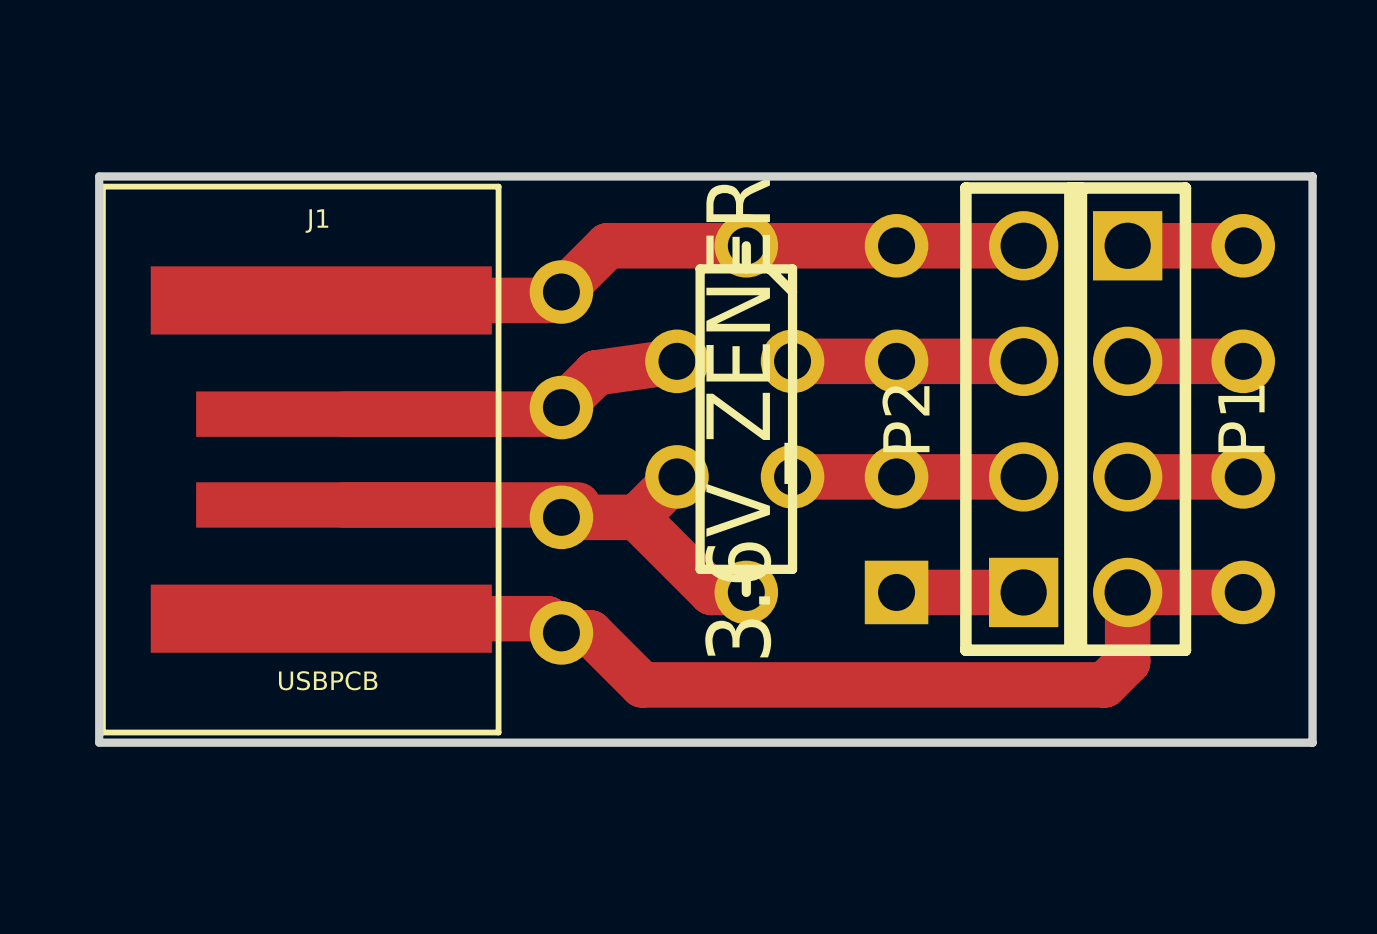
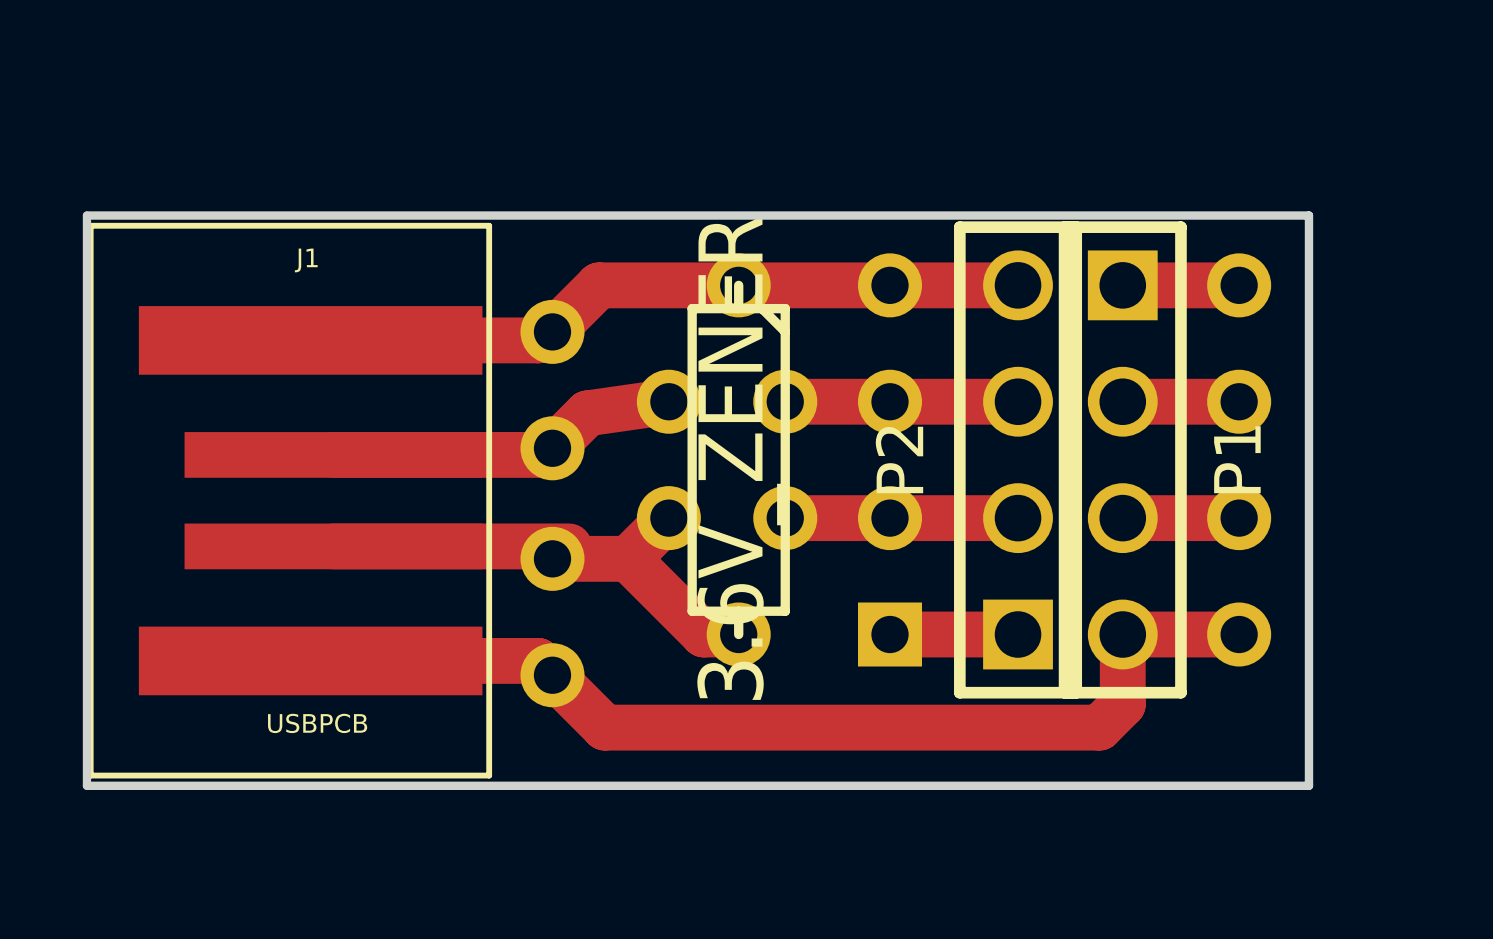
track: (561, 632) (590, 632) (642, 684) -> (552, 675) (604, 727) (633, 727)

